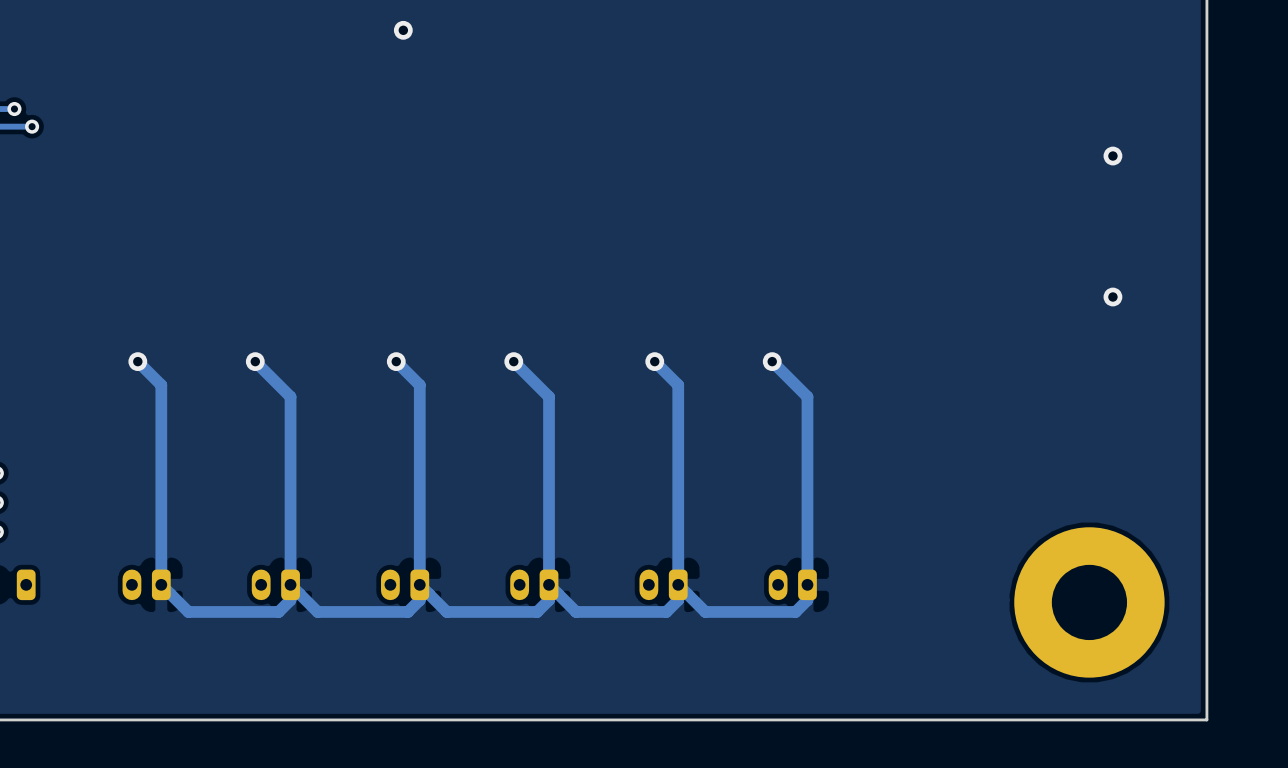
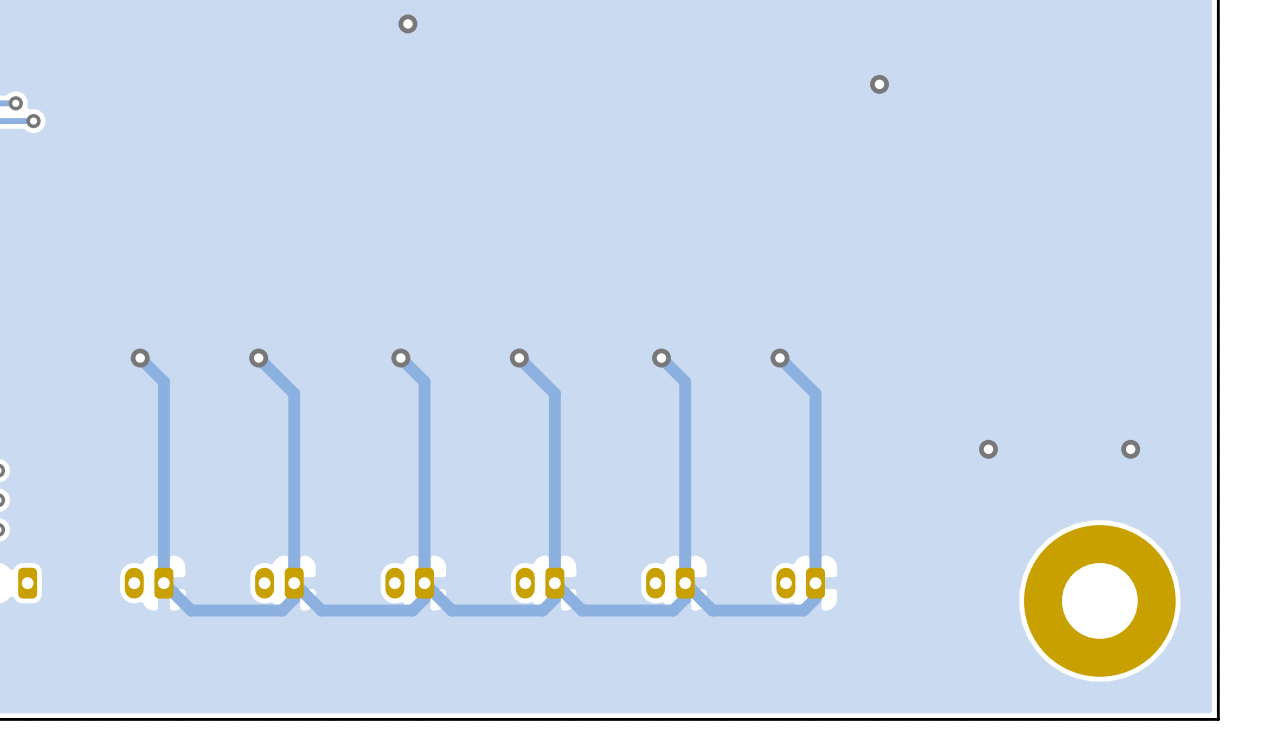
via: none -> (879, 84)
via: (1112, 156) -> none
via: (1112, 297) -> none
via: none -> (988, 449)
via: none -> (1130, 449)

